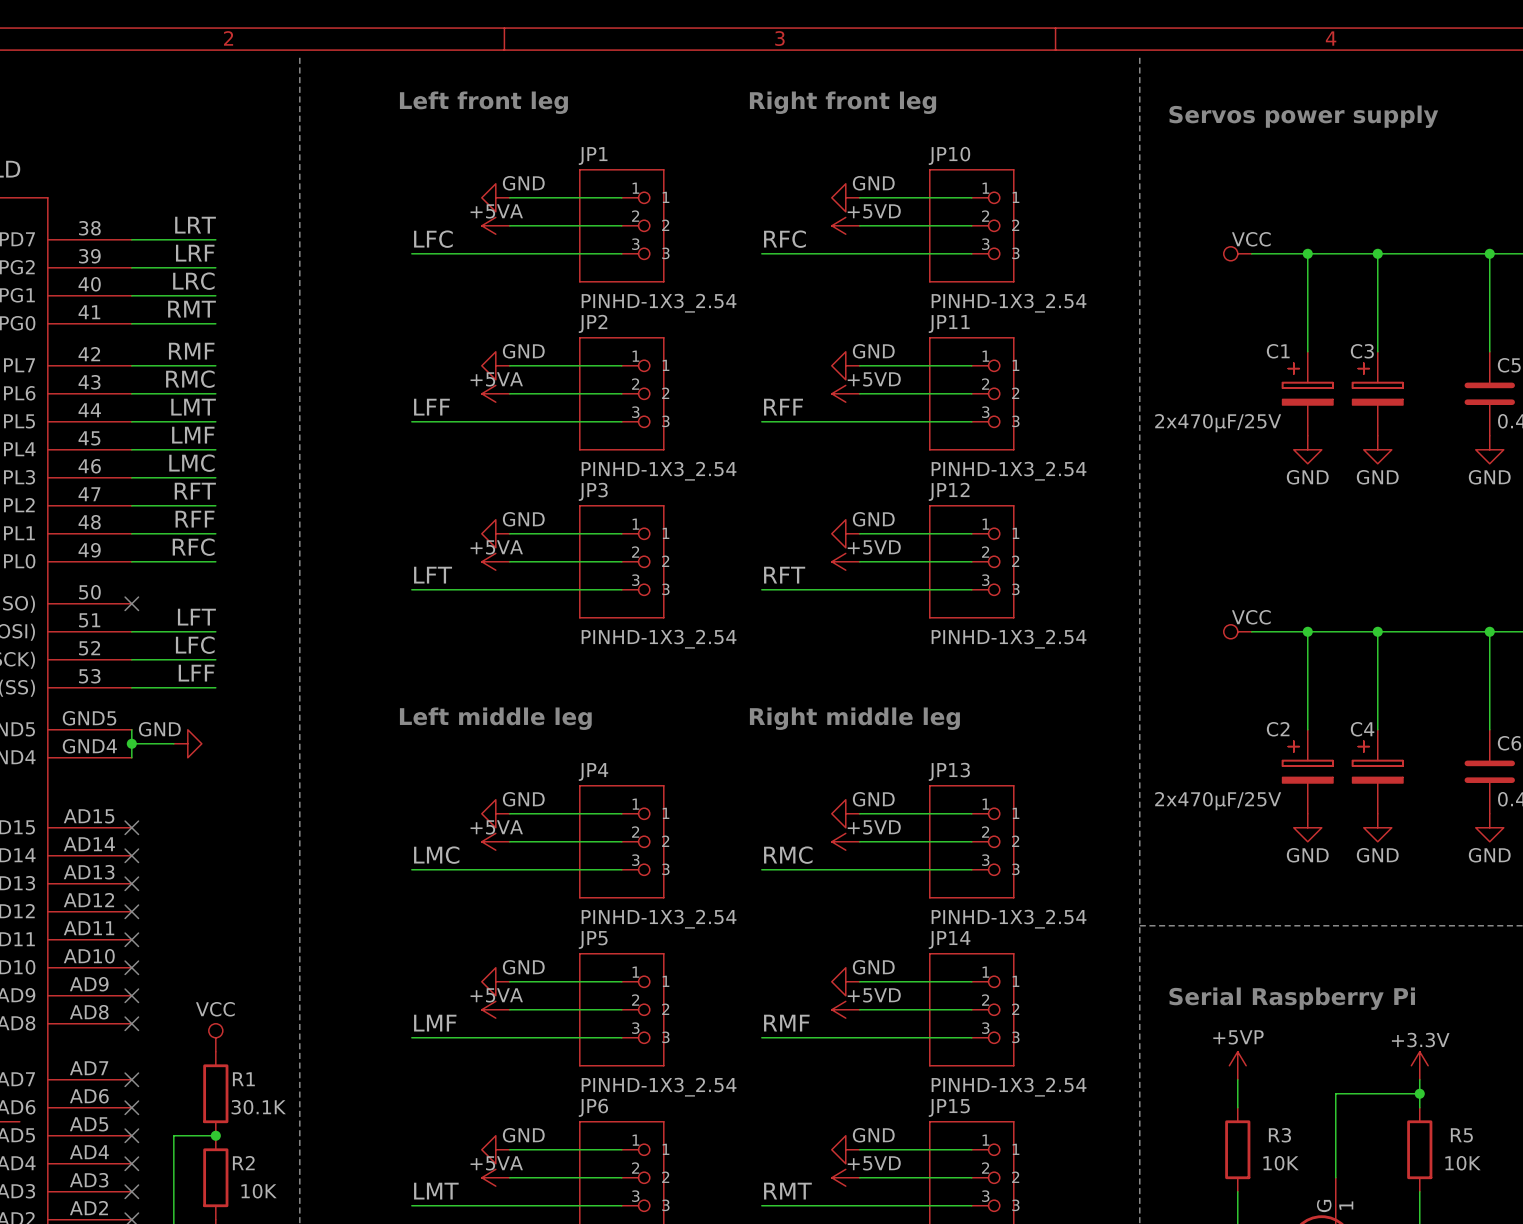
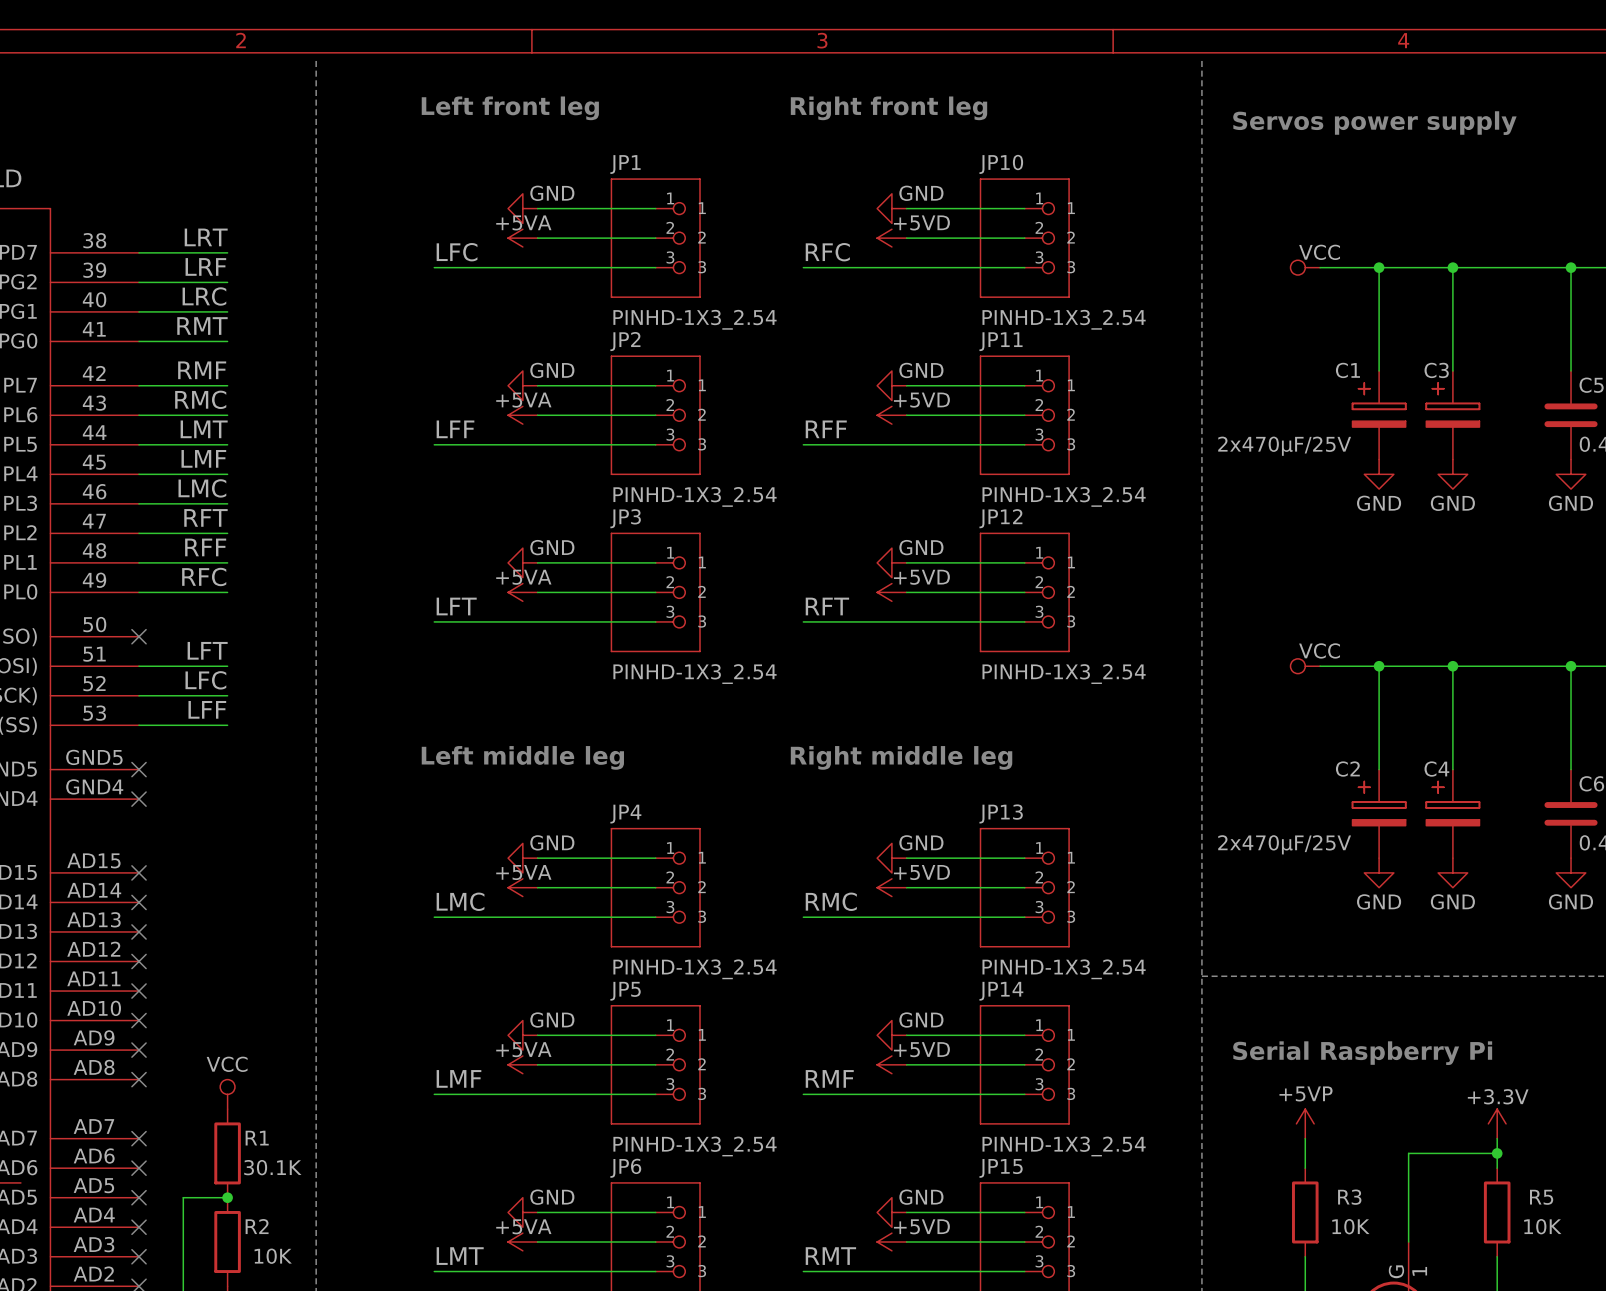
wire: (131, 729) (131, 757) -> none
no-connect mark: none -> (139, 769)
wire: (131, 743) (173, 743) -> none
junction: (131, 743) -> none
power symbol: GND (187, 743) -> none
no-connect mark: none -> (139, 799)

